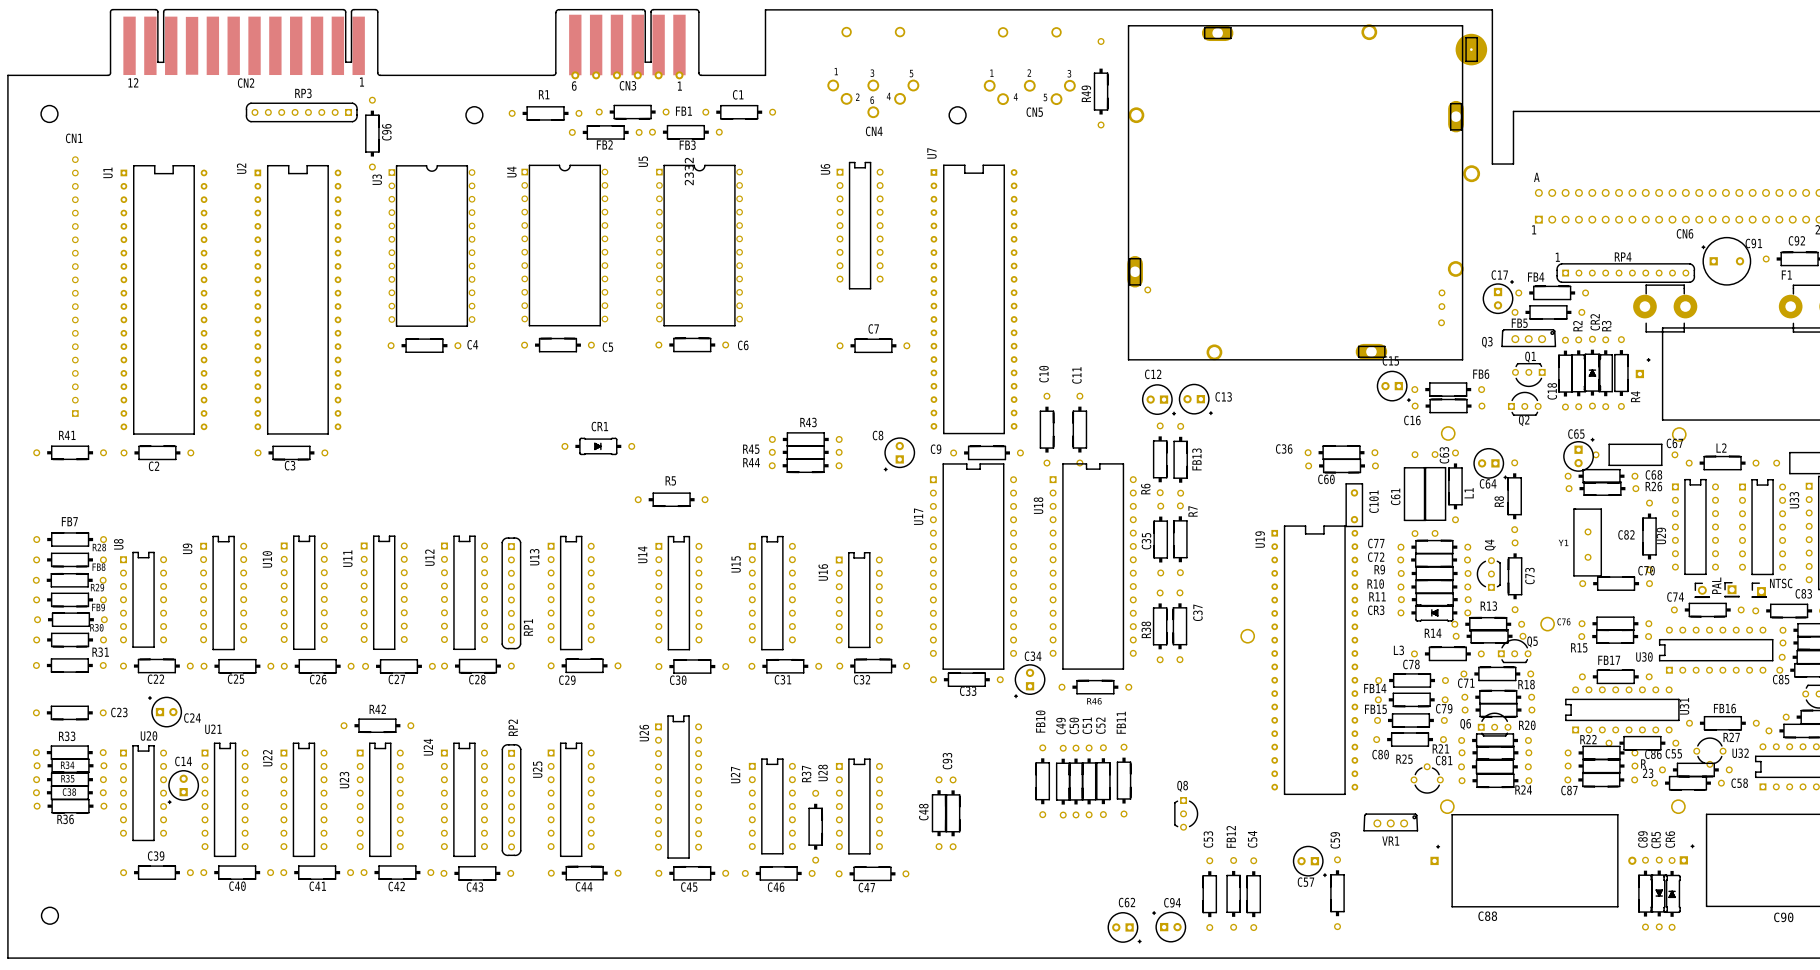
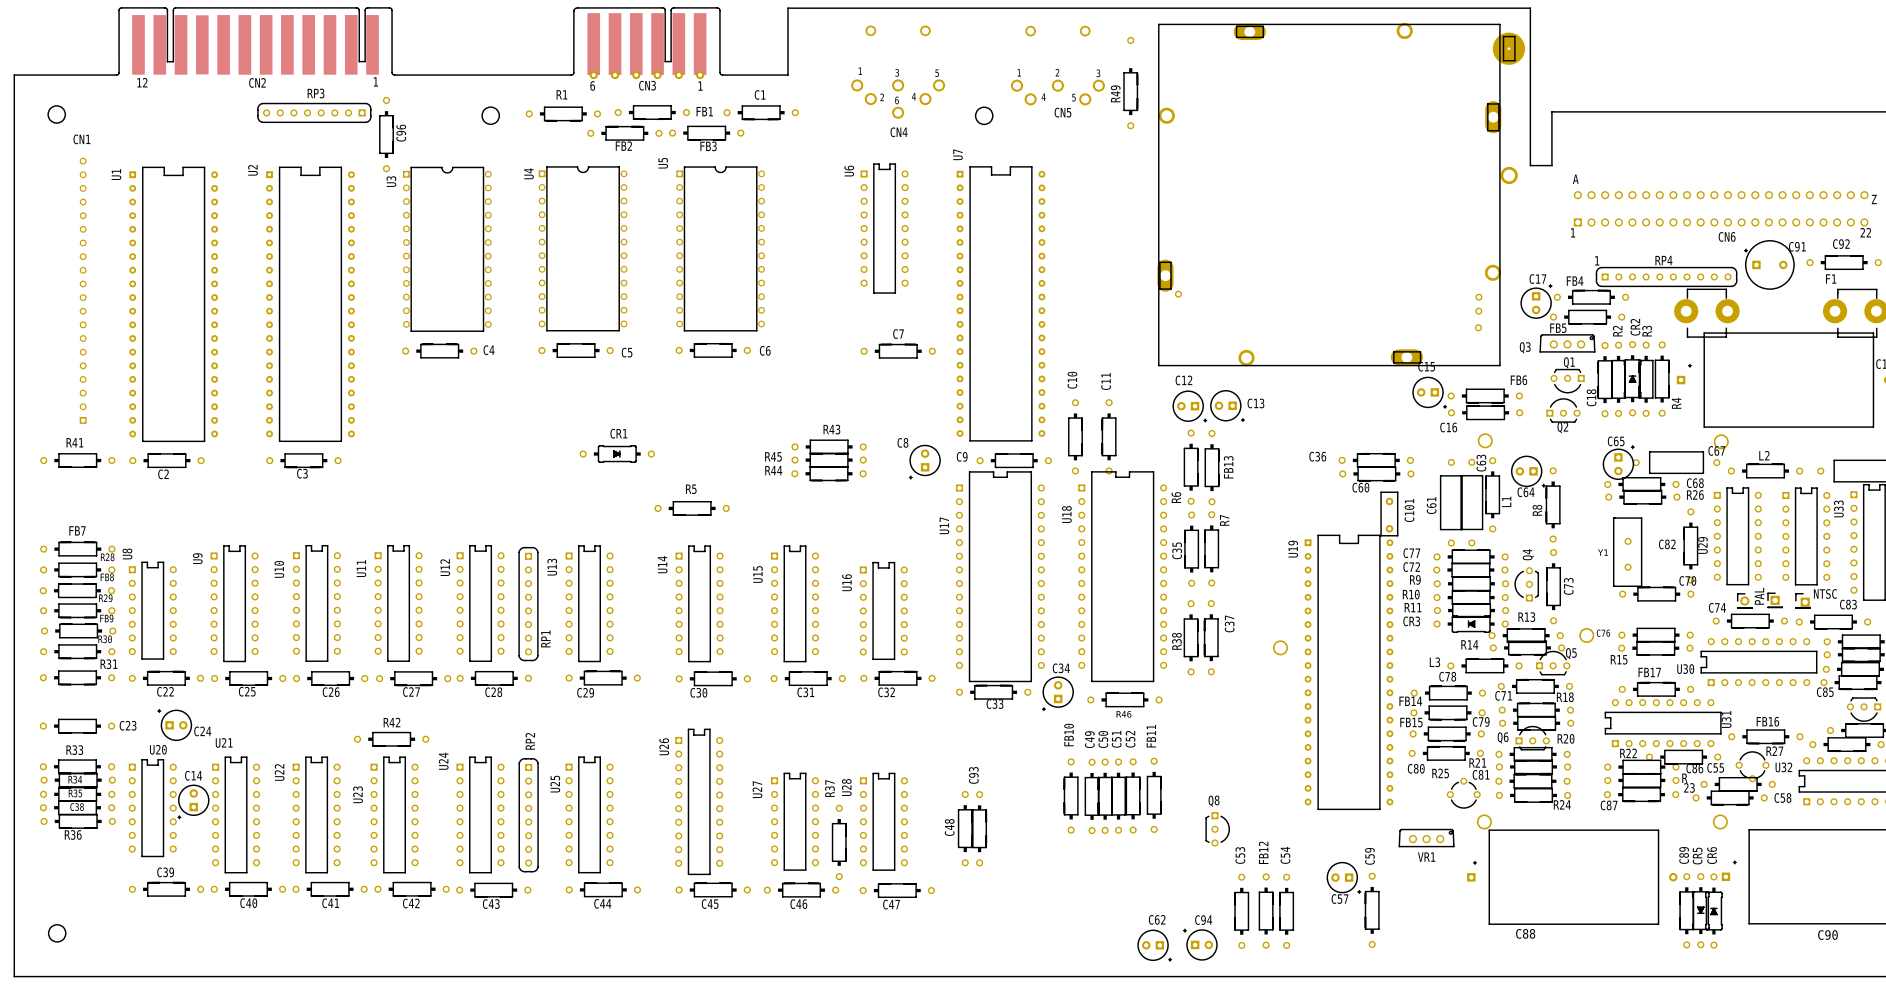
U5 value: 2332 (689, 171) -> none

